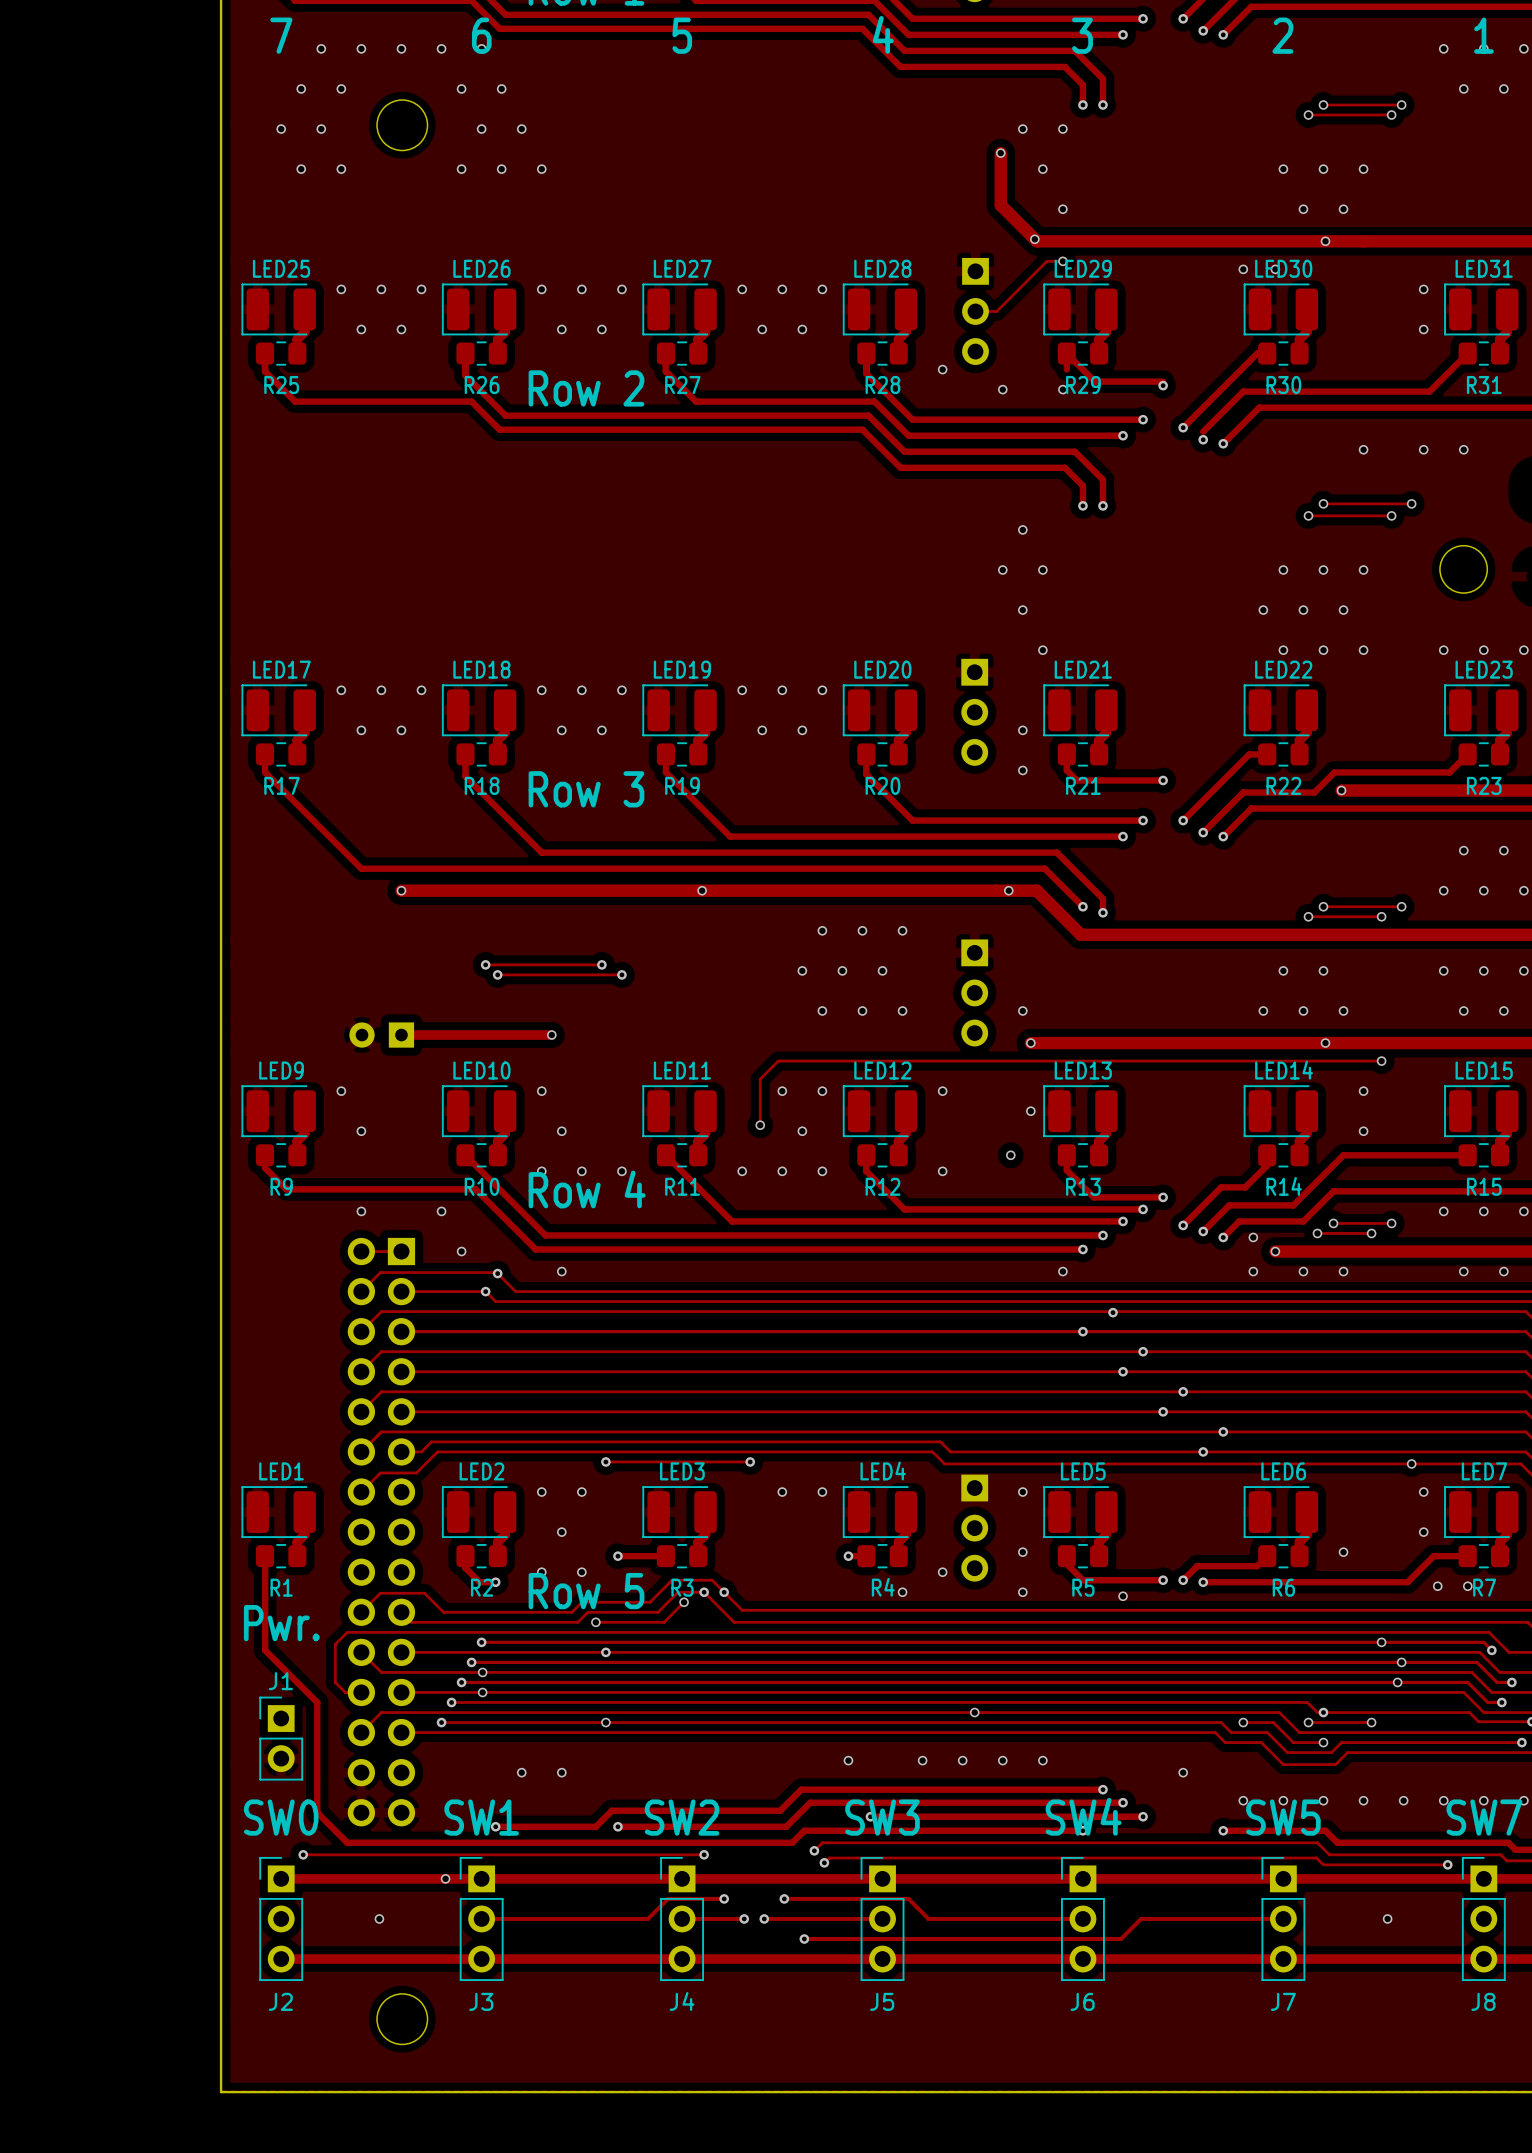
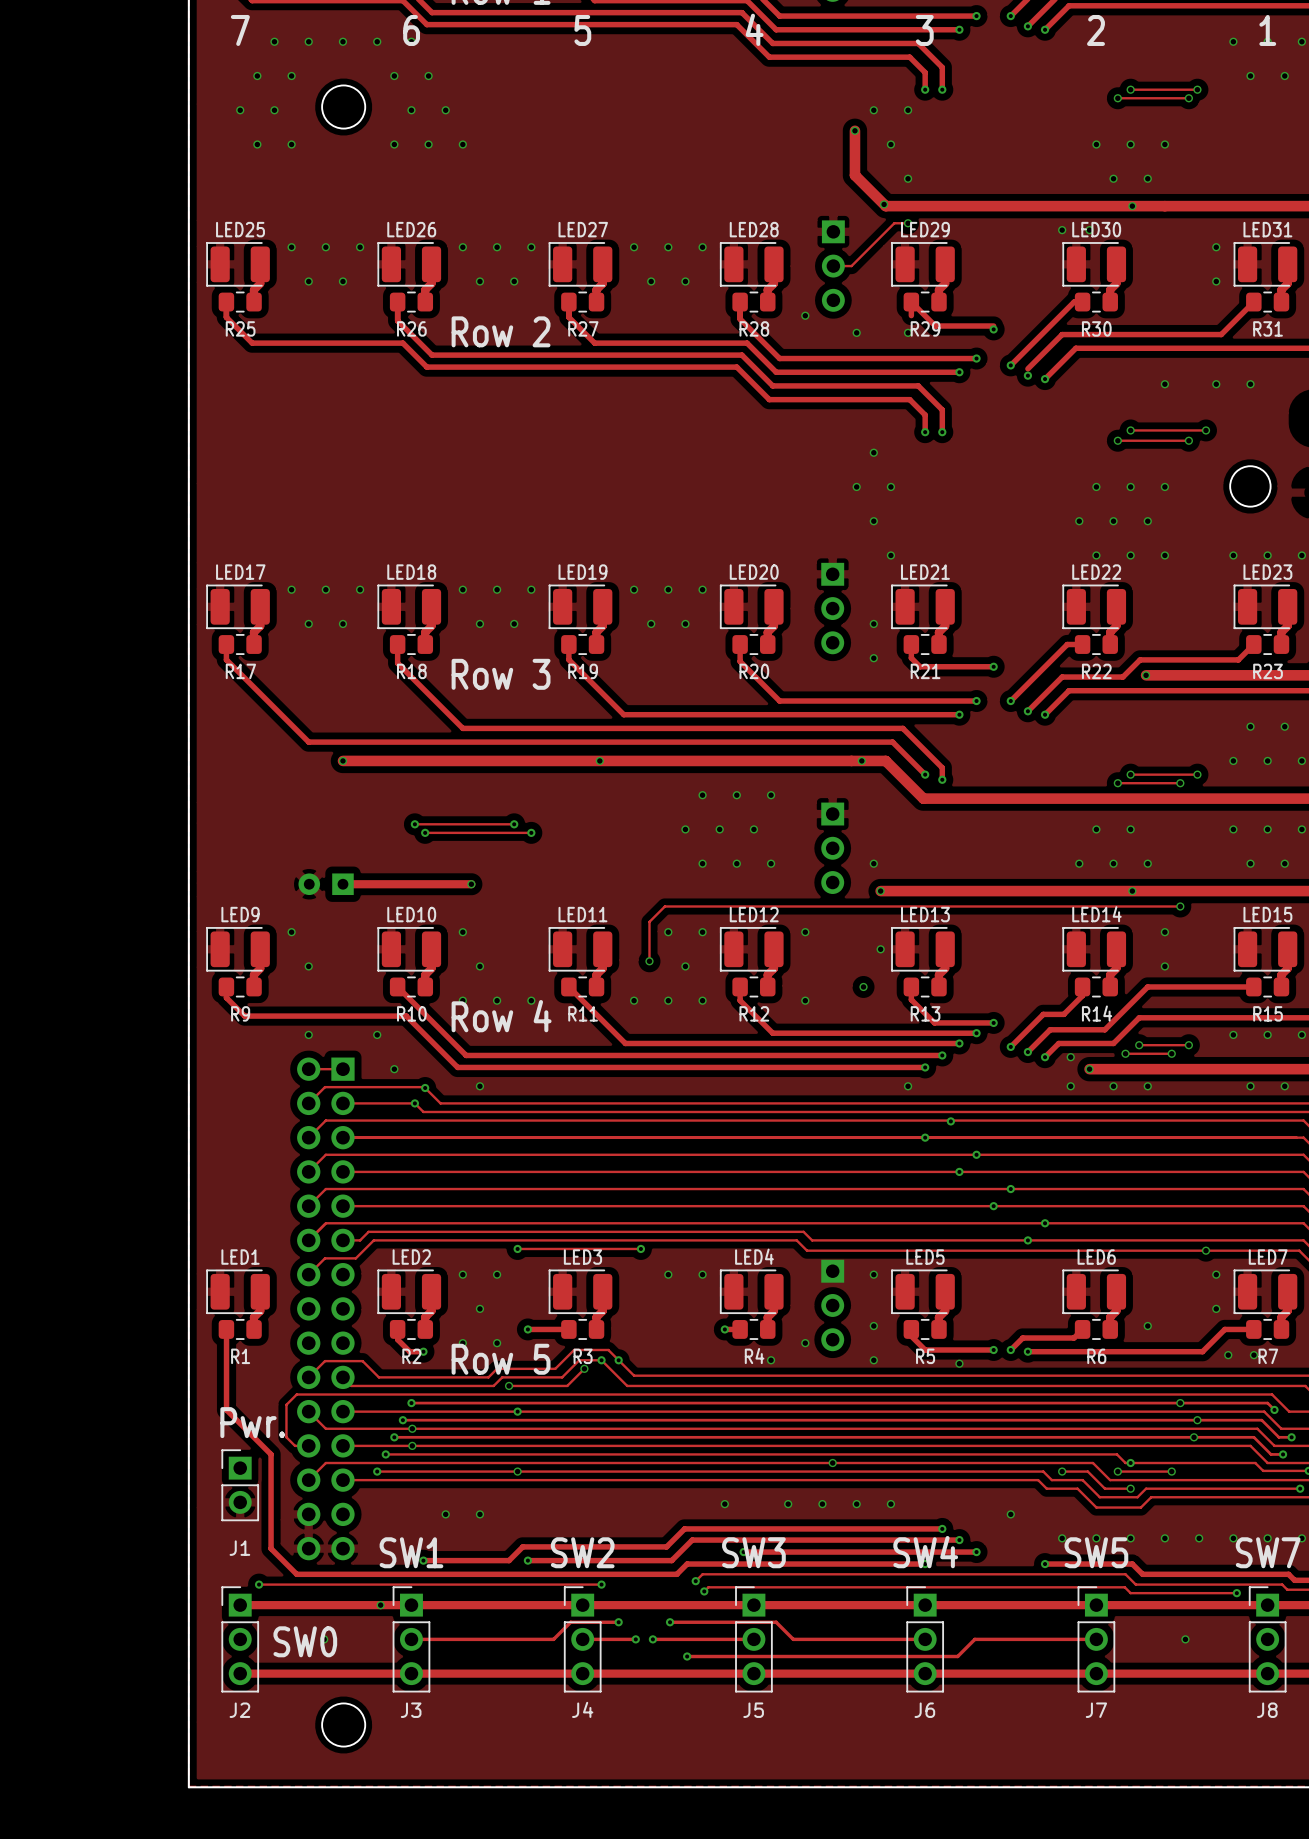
text position: Pwr. (281, 1623) -> Pwr. (252, 1422)
J1 name position: J1 (280, 1681) -> J1 (239, 1548)
text position: SW0 (281, 1817) -> SW0 (305, 1641)

